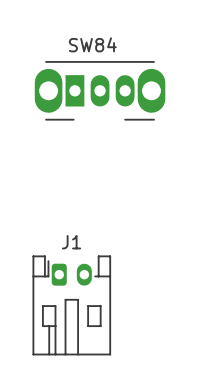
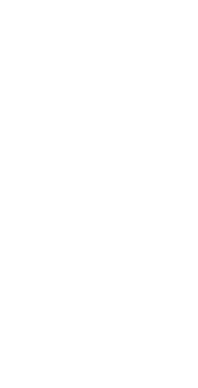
SW84: (100, 90) -> none
J1: (71, 305) -> none

